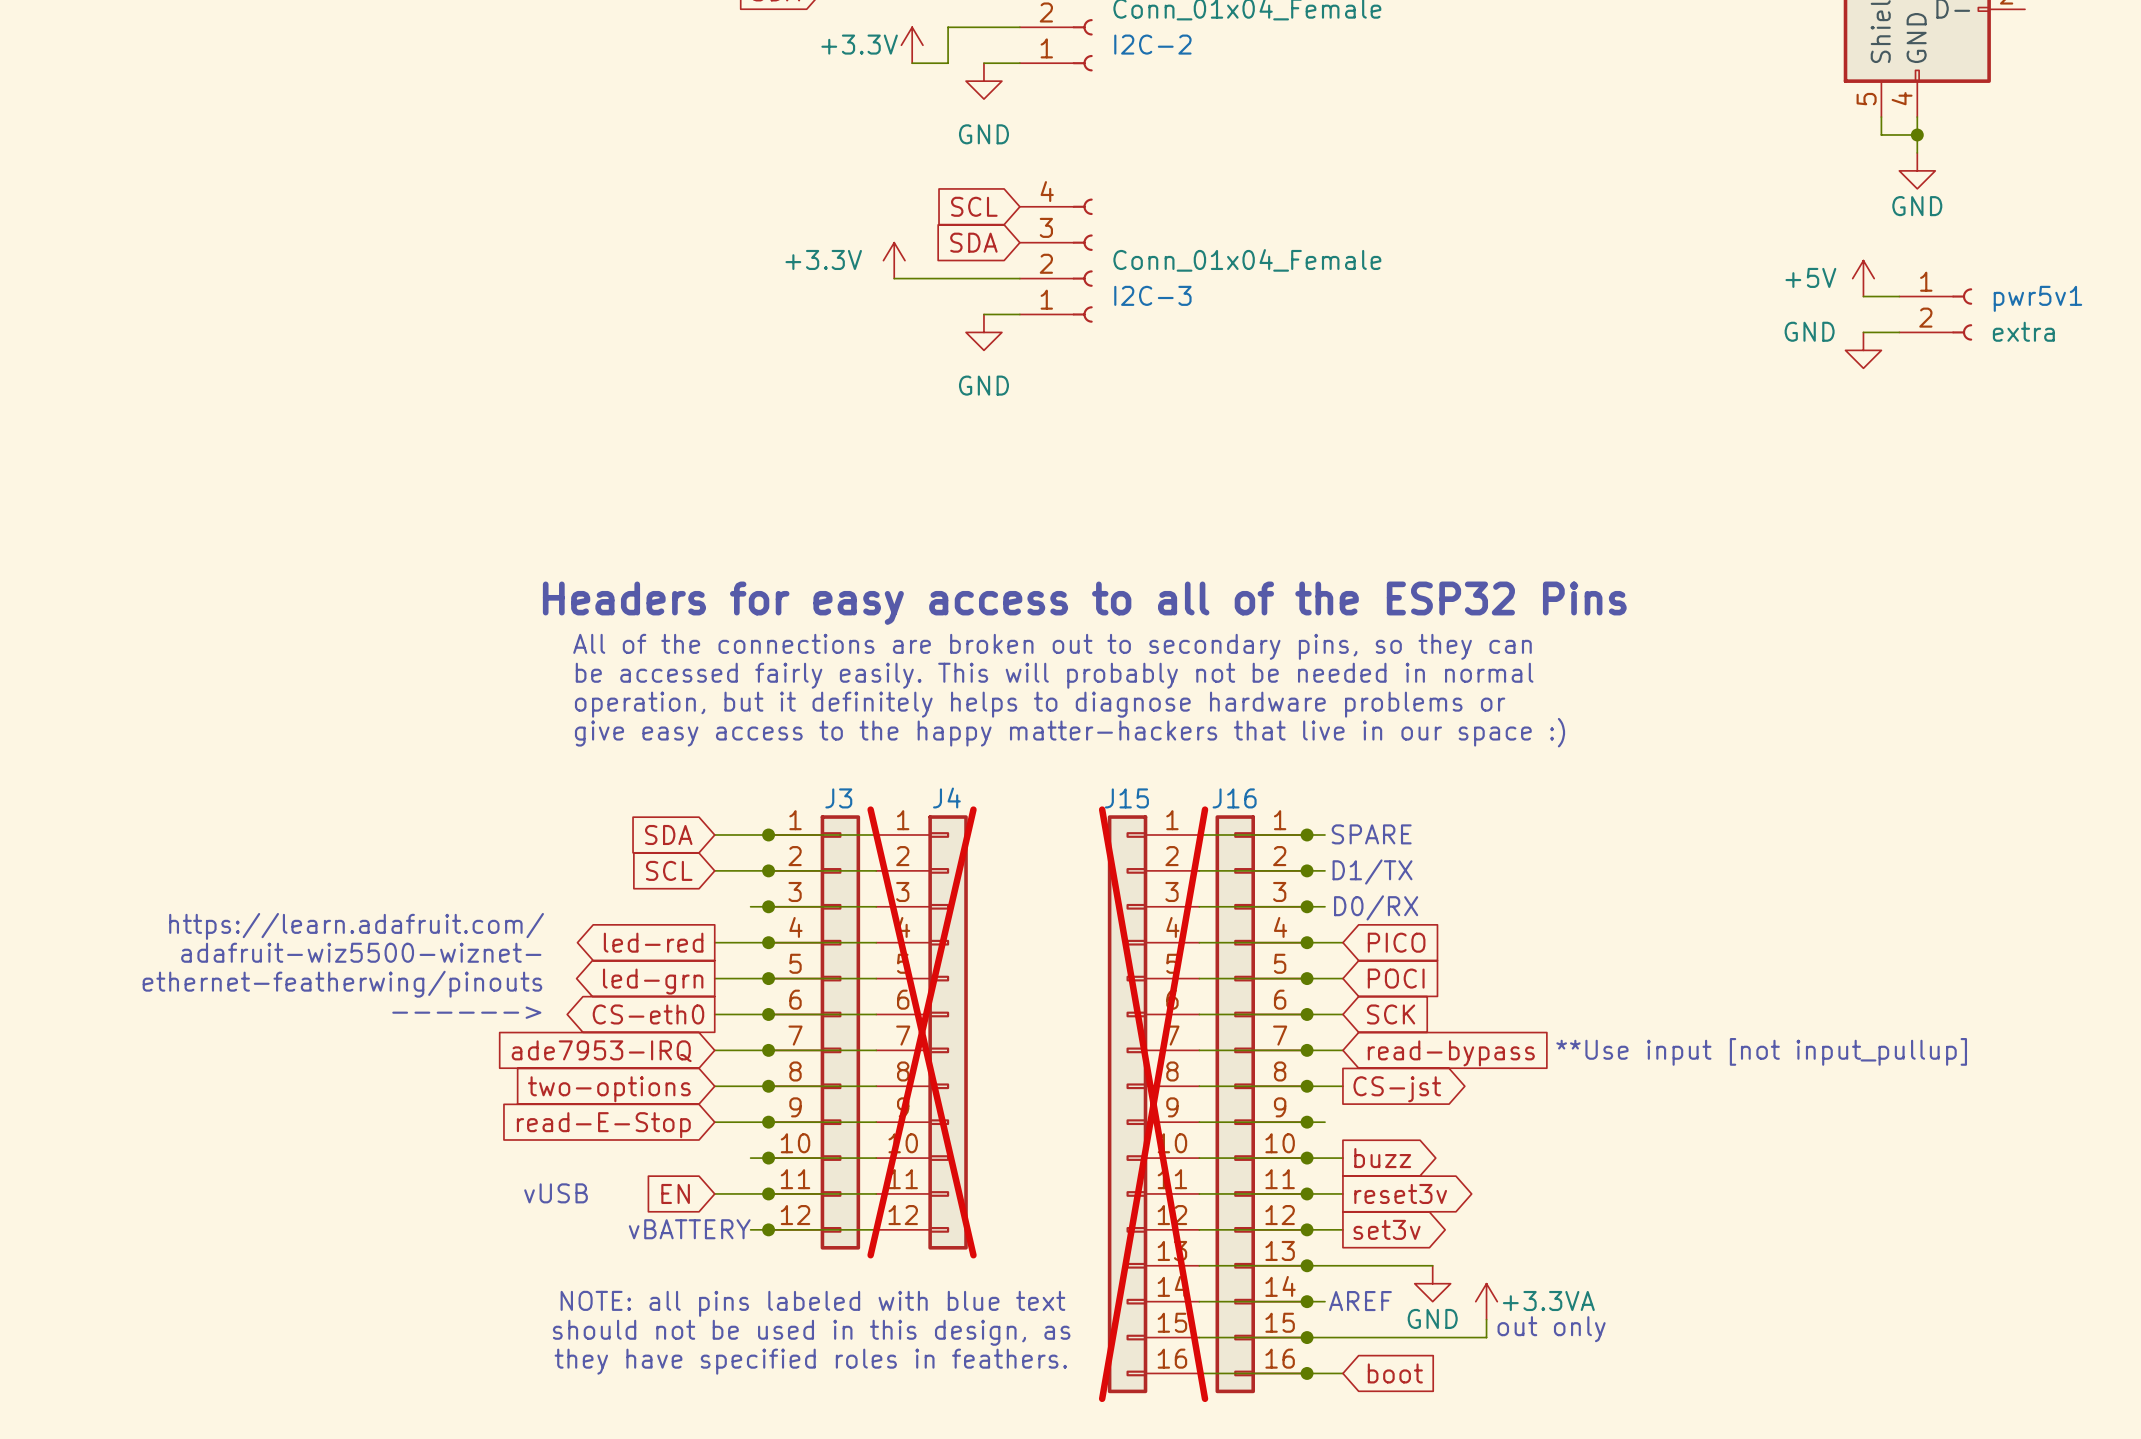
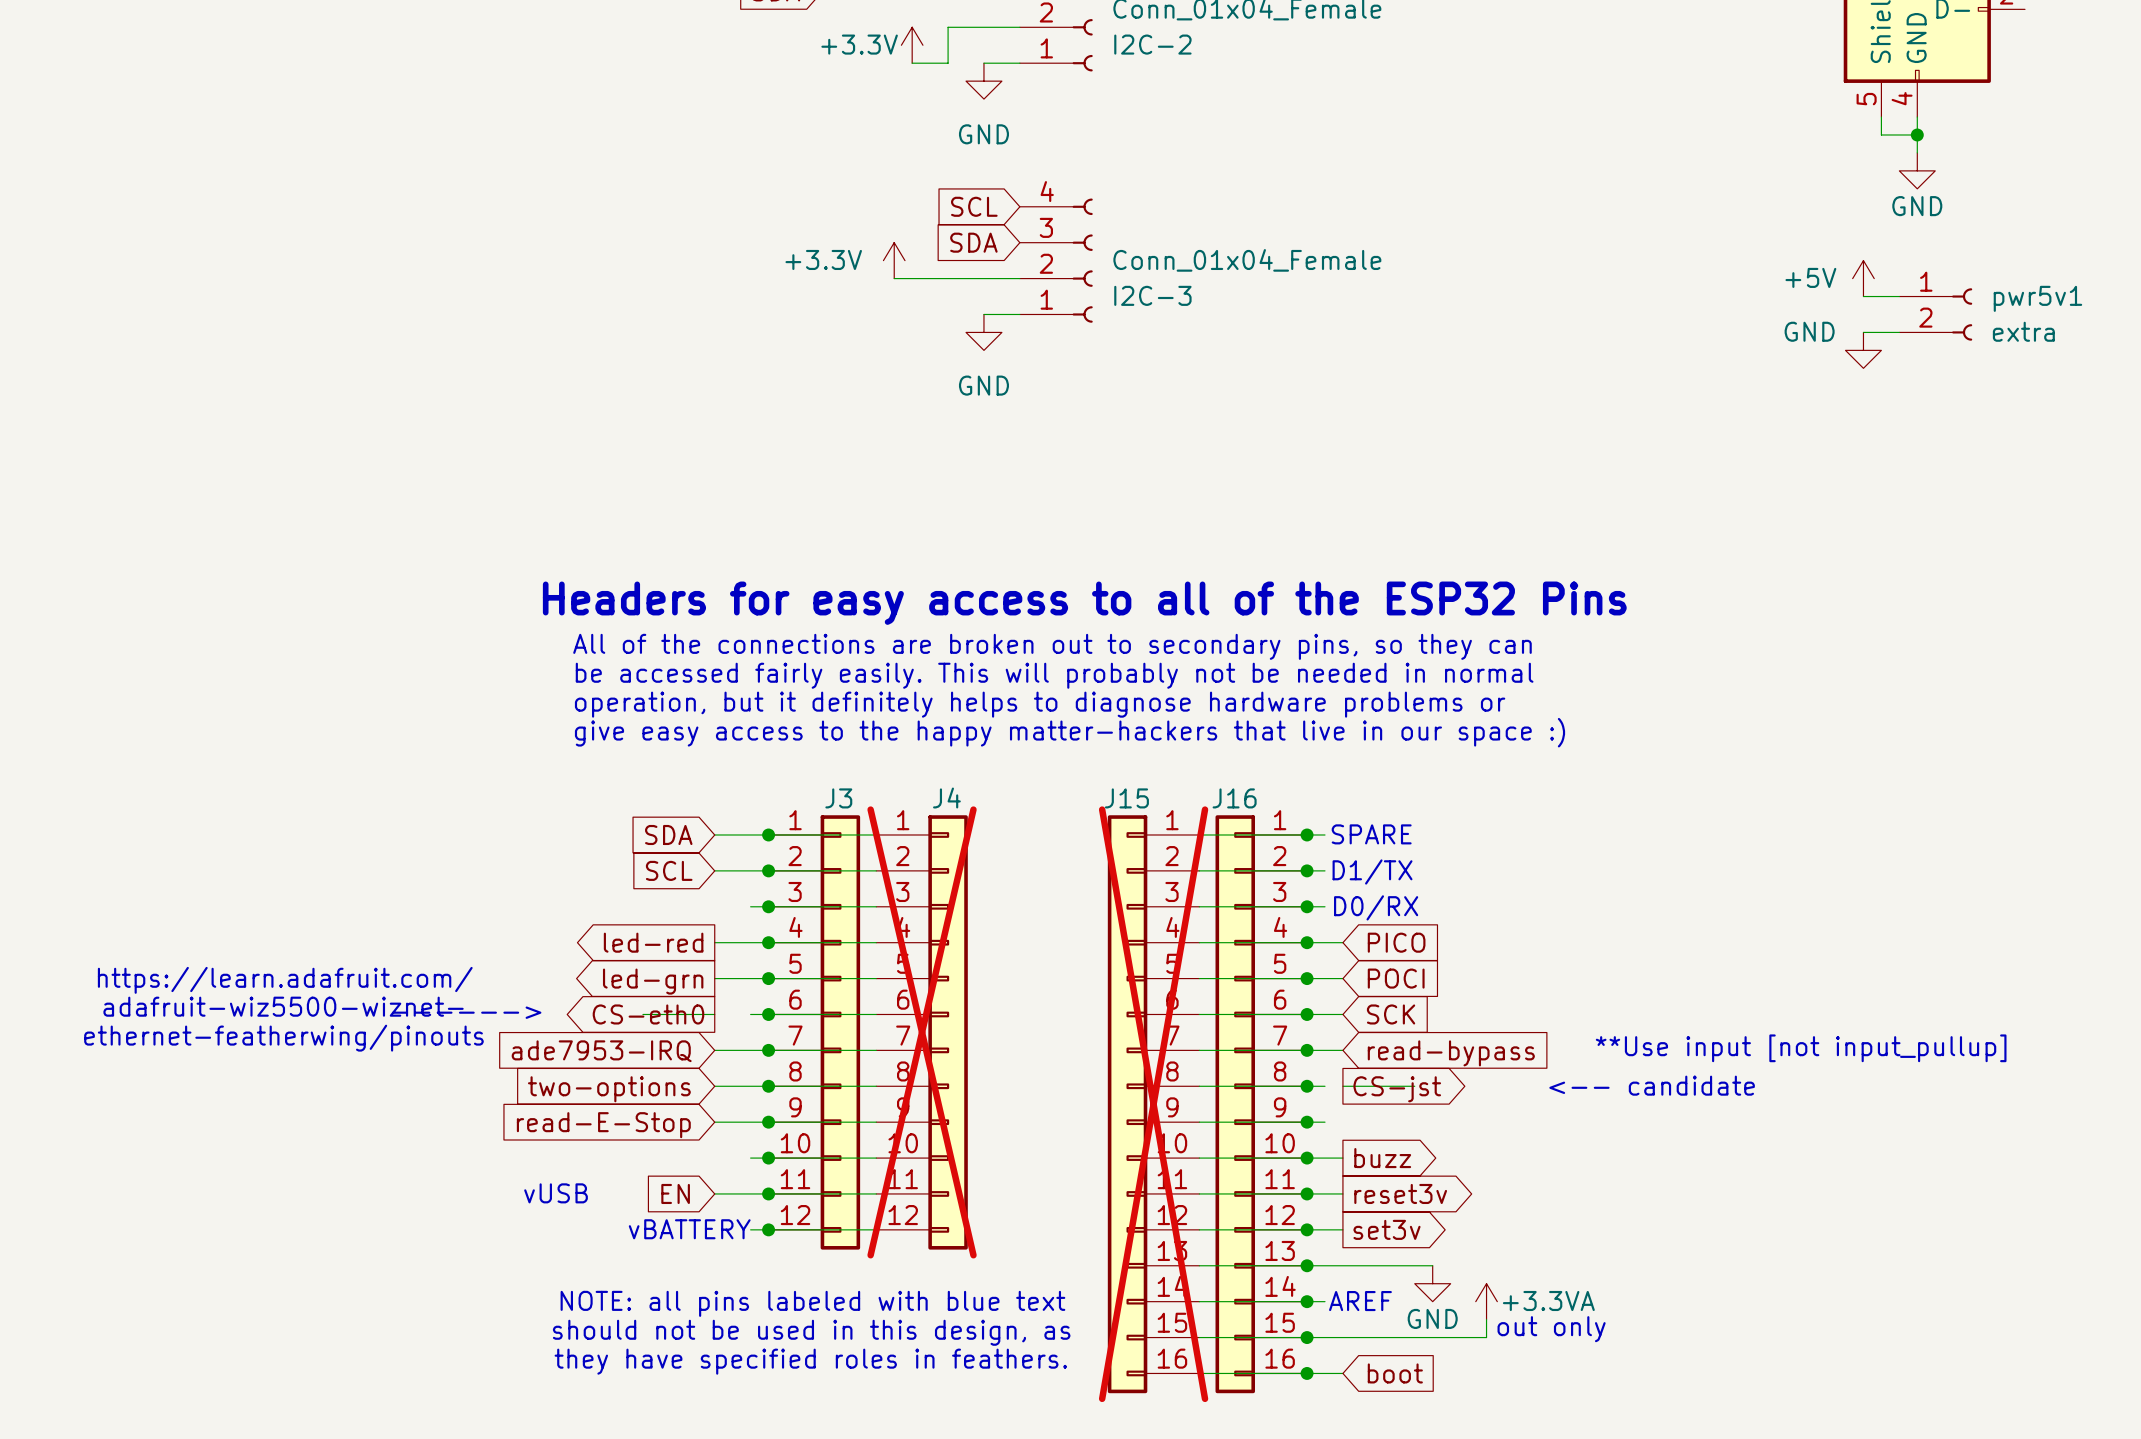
text position: https://learn.adafruit.com/ (356, 926) -> https://learn.adafruit.com/ (285, 980)
text position: adafruit-wiz5500-wiznet- (361, 952) -> adafruit-wiz5500-wiznet- (283, 1006)
text position: ethernet-featherwing/pinouts (342, 984) -> ethernet-featherwing/pinouts (283, 1038)
wire: (714, 1014) (750, 1014) -> (714, 1014) (642, 1014)
text position: **Use input [not input_pullup] (1761, 1051) -> **Use input [not input_pullup] (1801, 1048)
text: none -> <-- candidate (1652, 1085)
wire: (1325, 1086) (1342, 1086) -> (1414, 1086) (1342, 1086)

